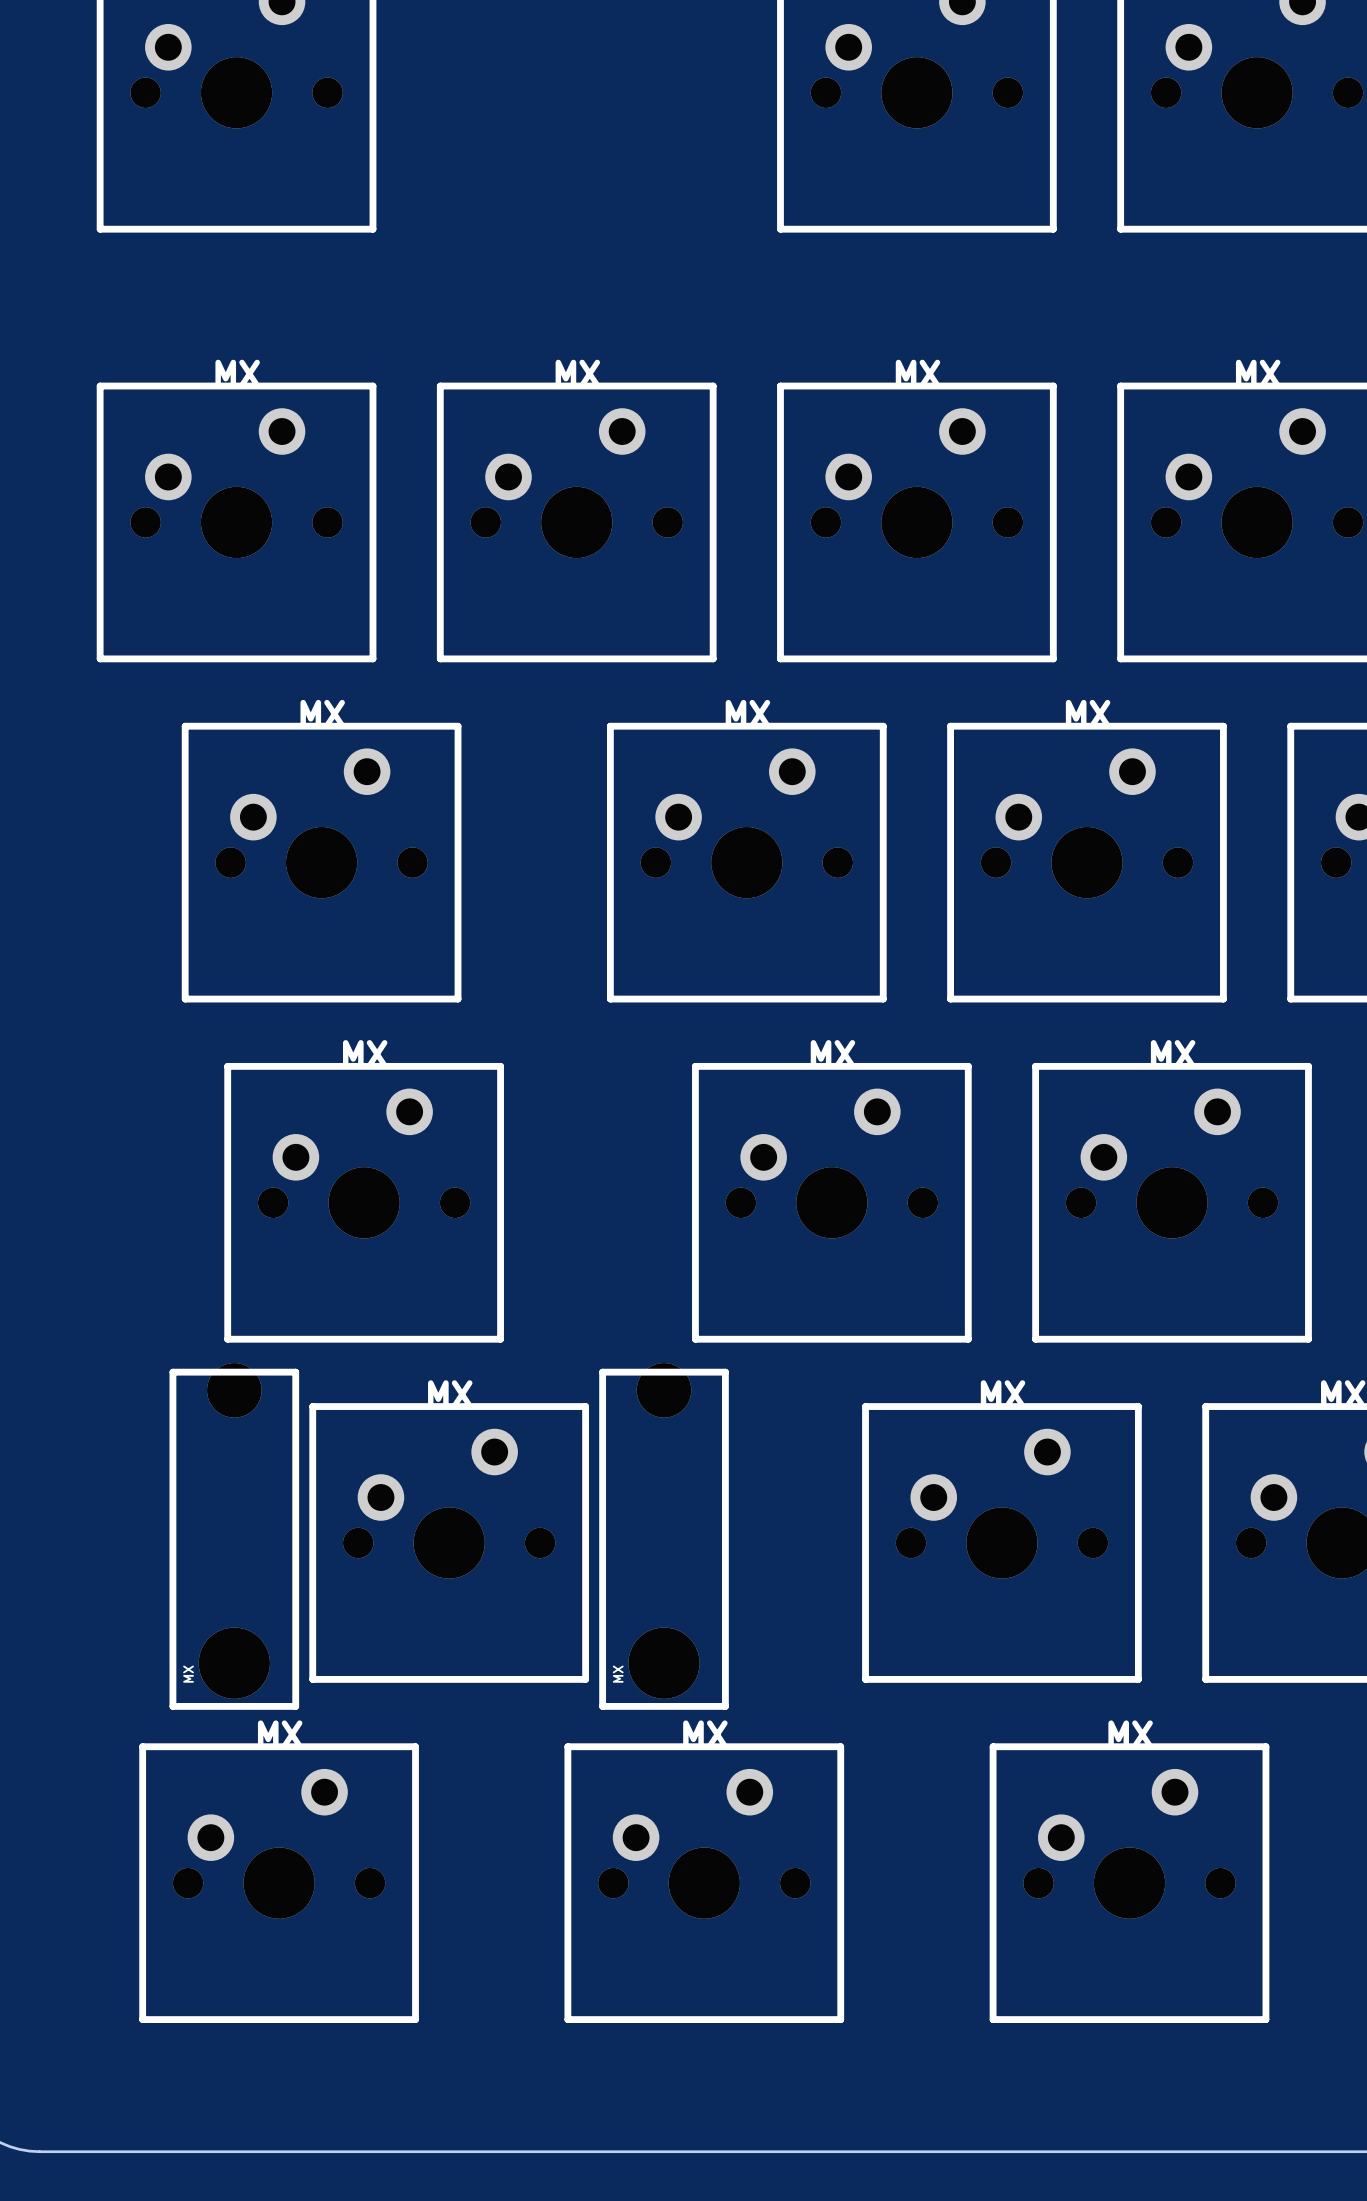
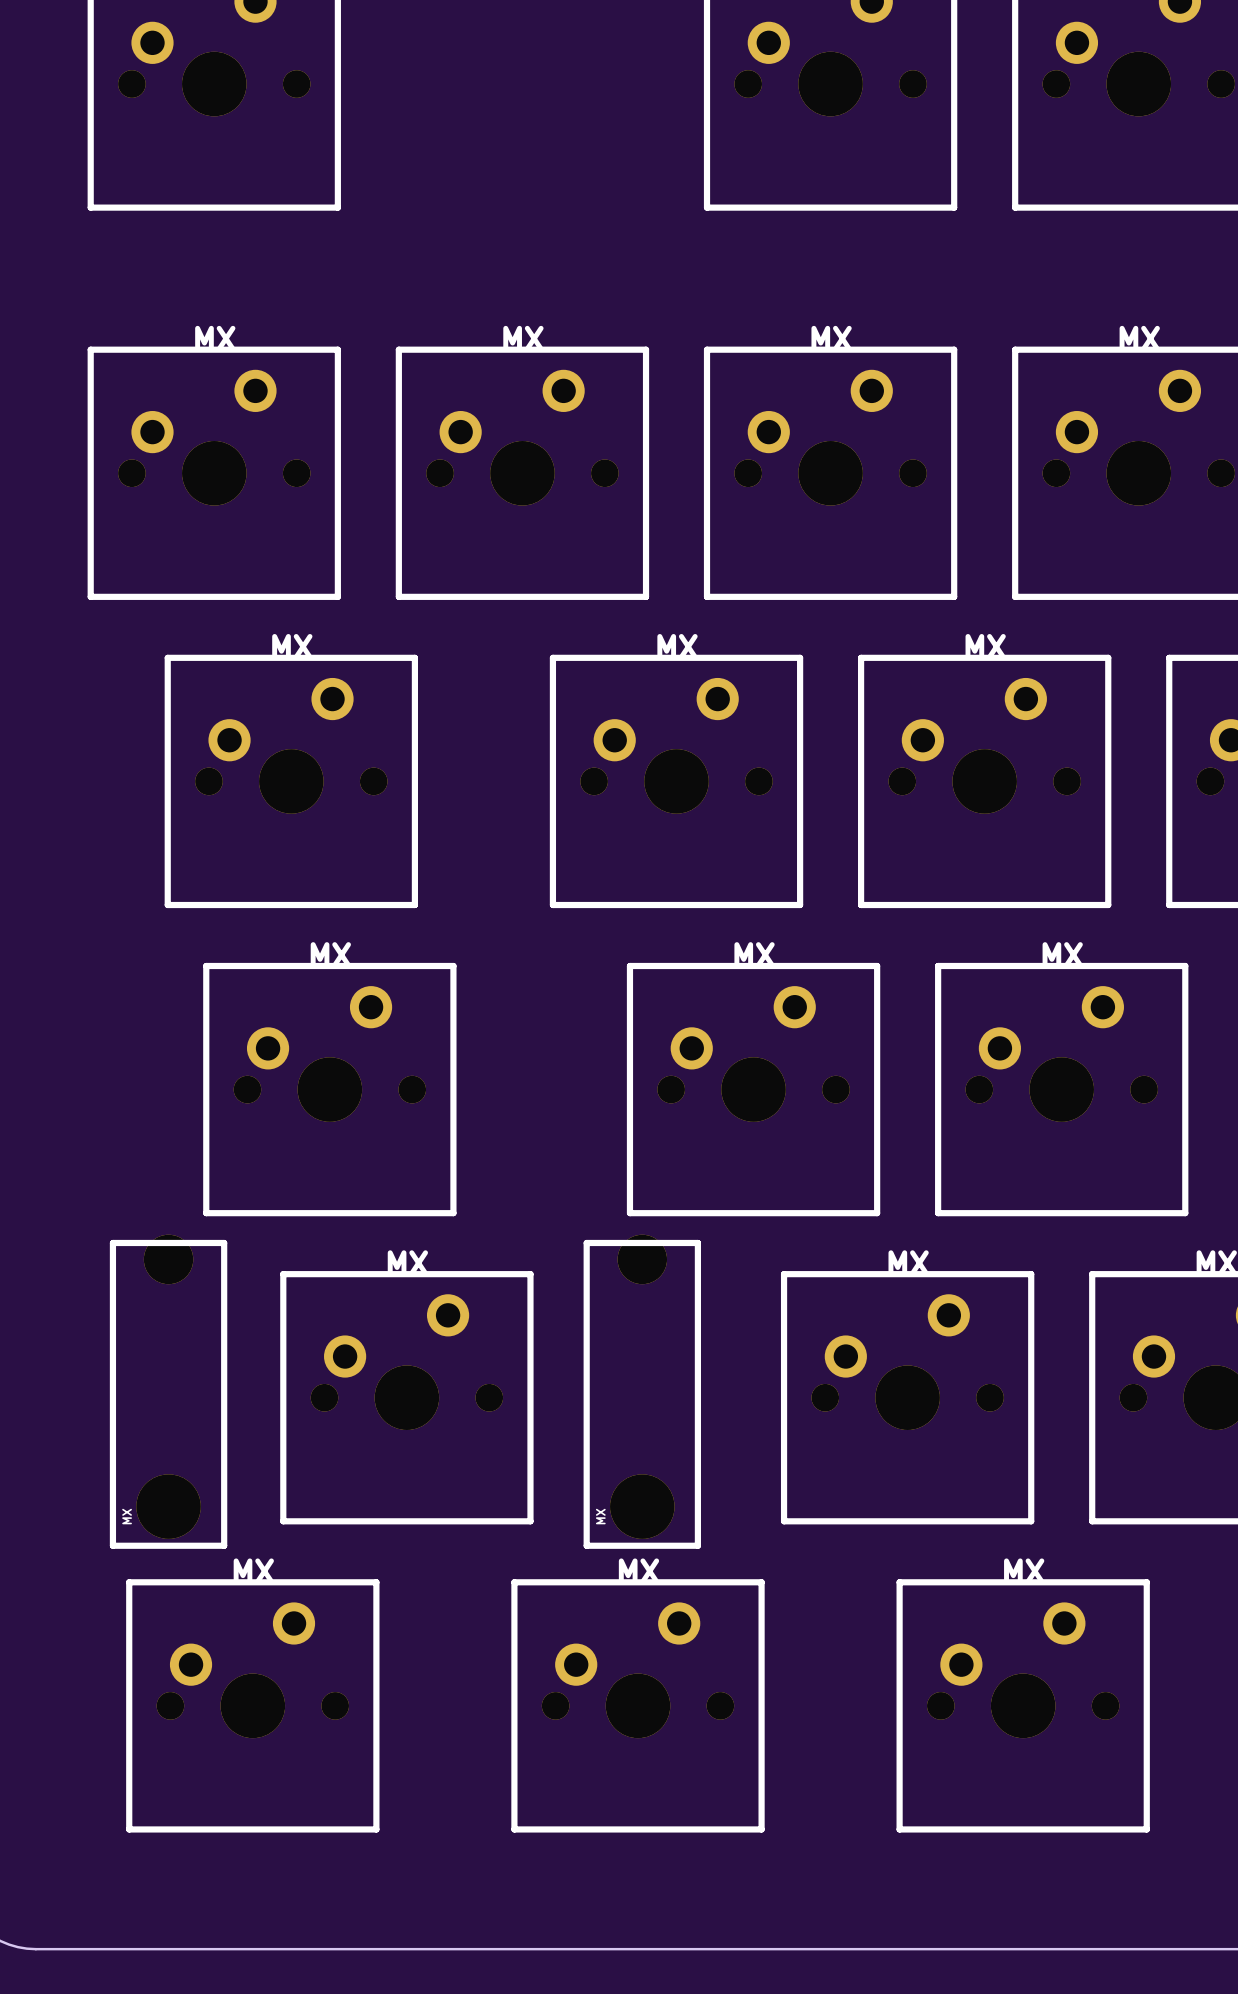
part position: (234, 1536) -> (168, 1391)
part position: (664, 1536) -> (642, 1391)

